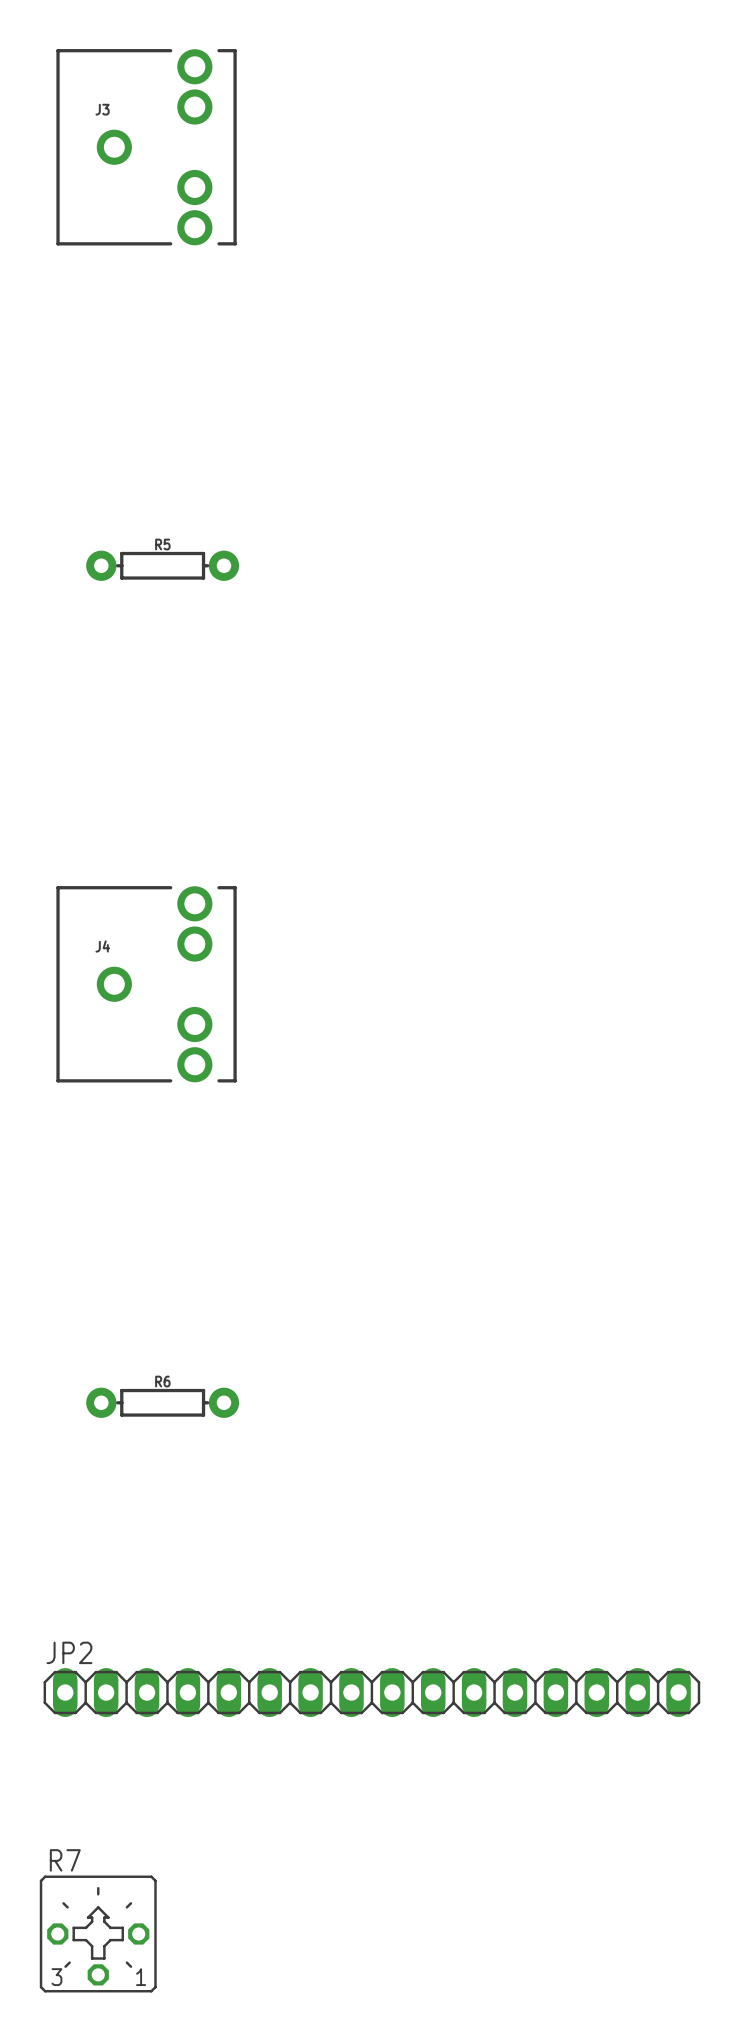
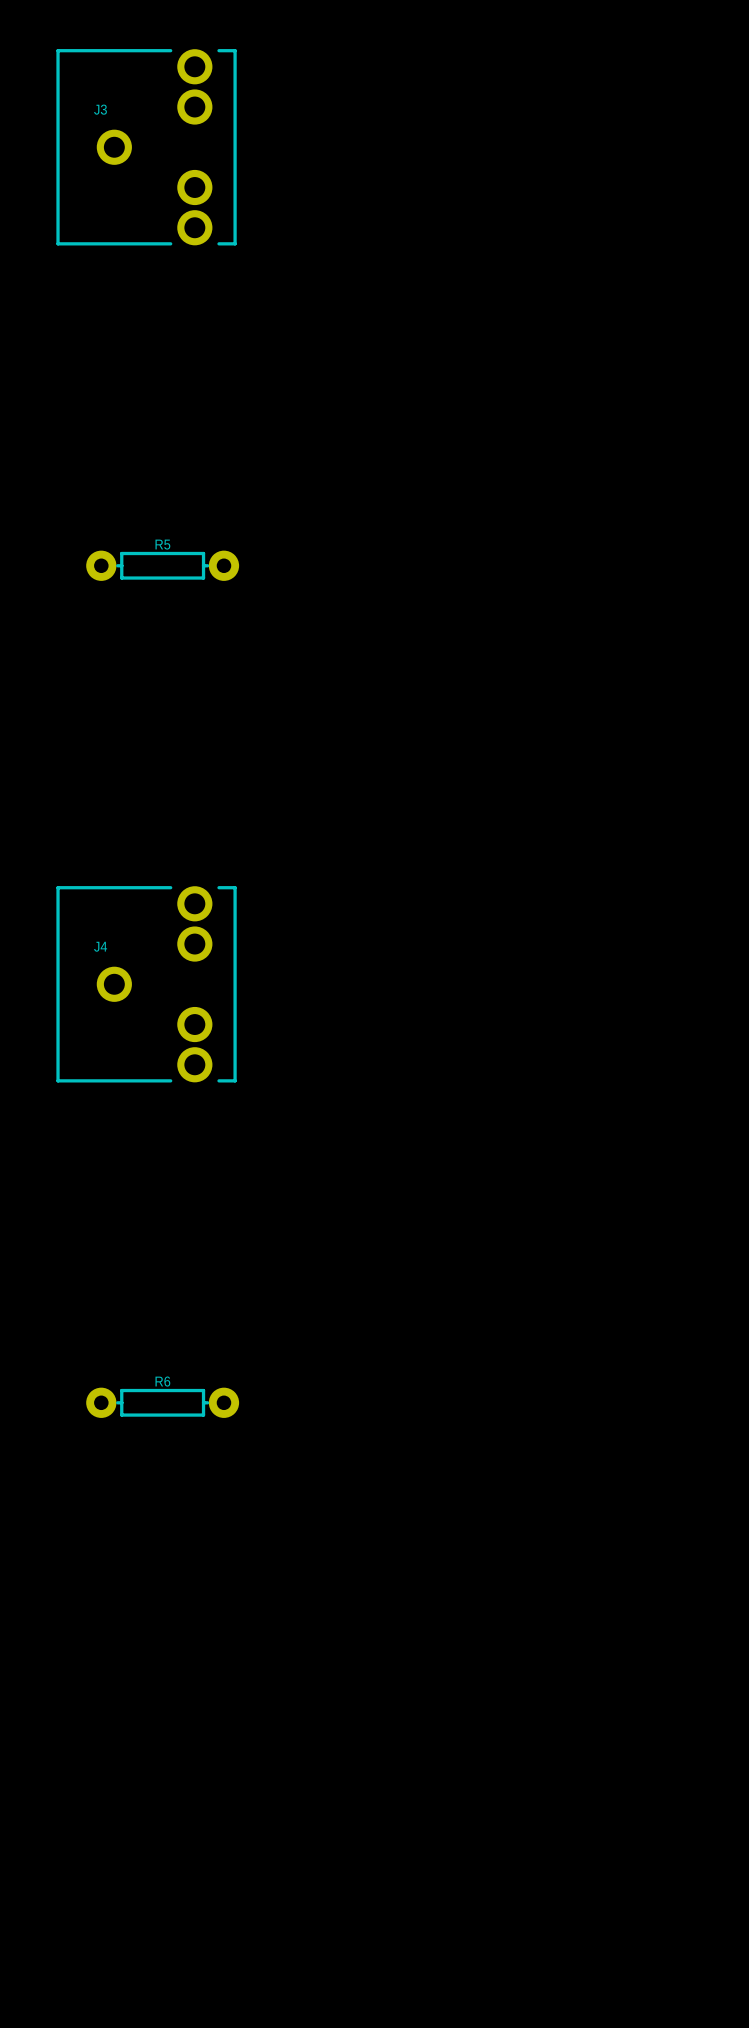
JP2: (371, 1692) -> none
R7: (98, 1933) -> none

